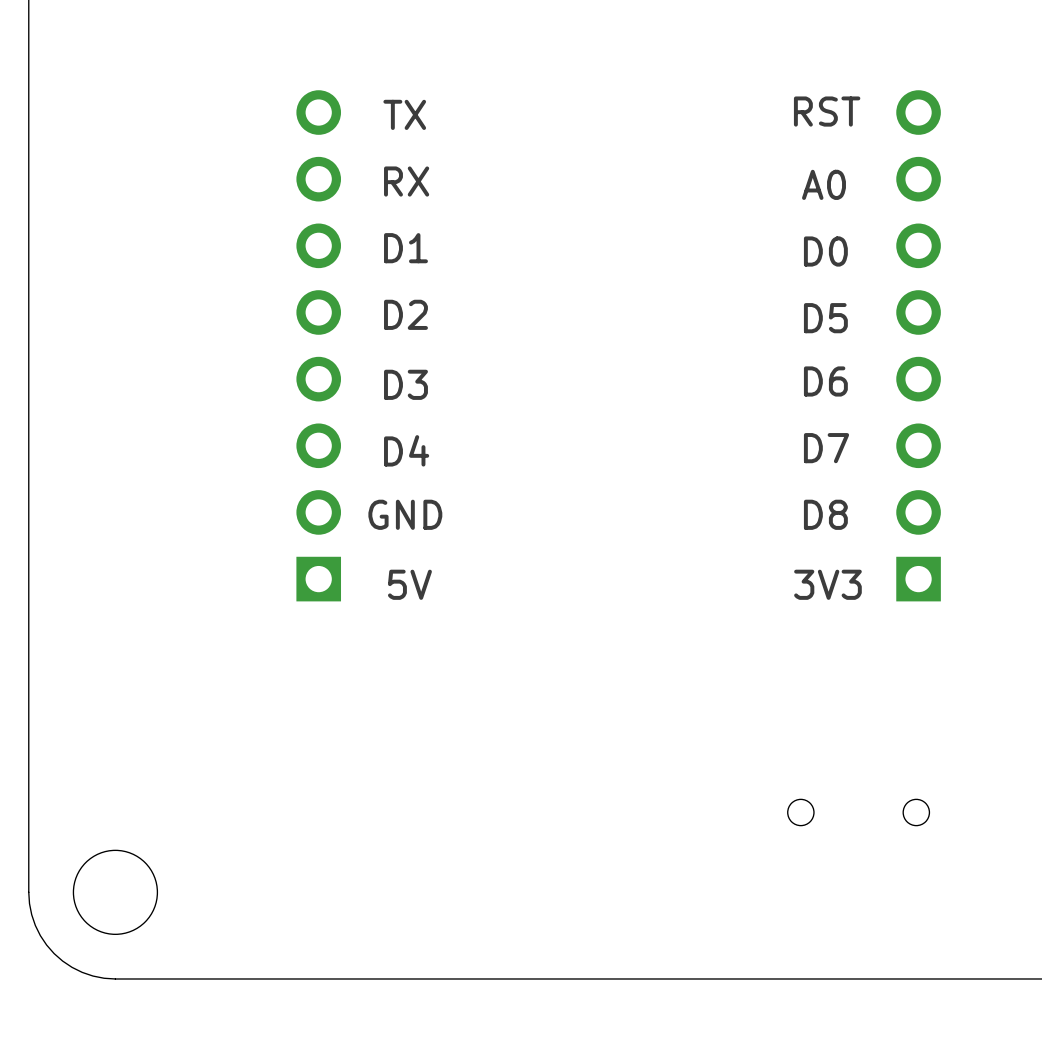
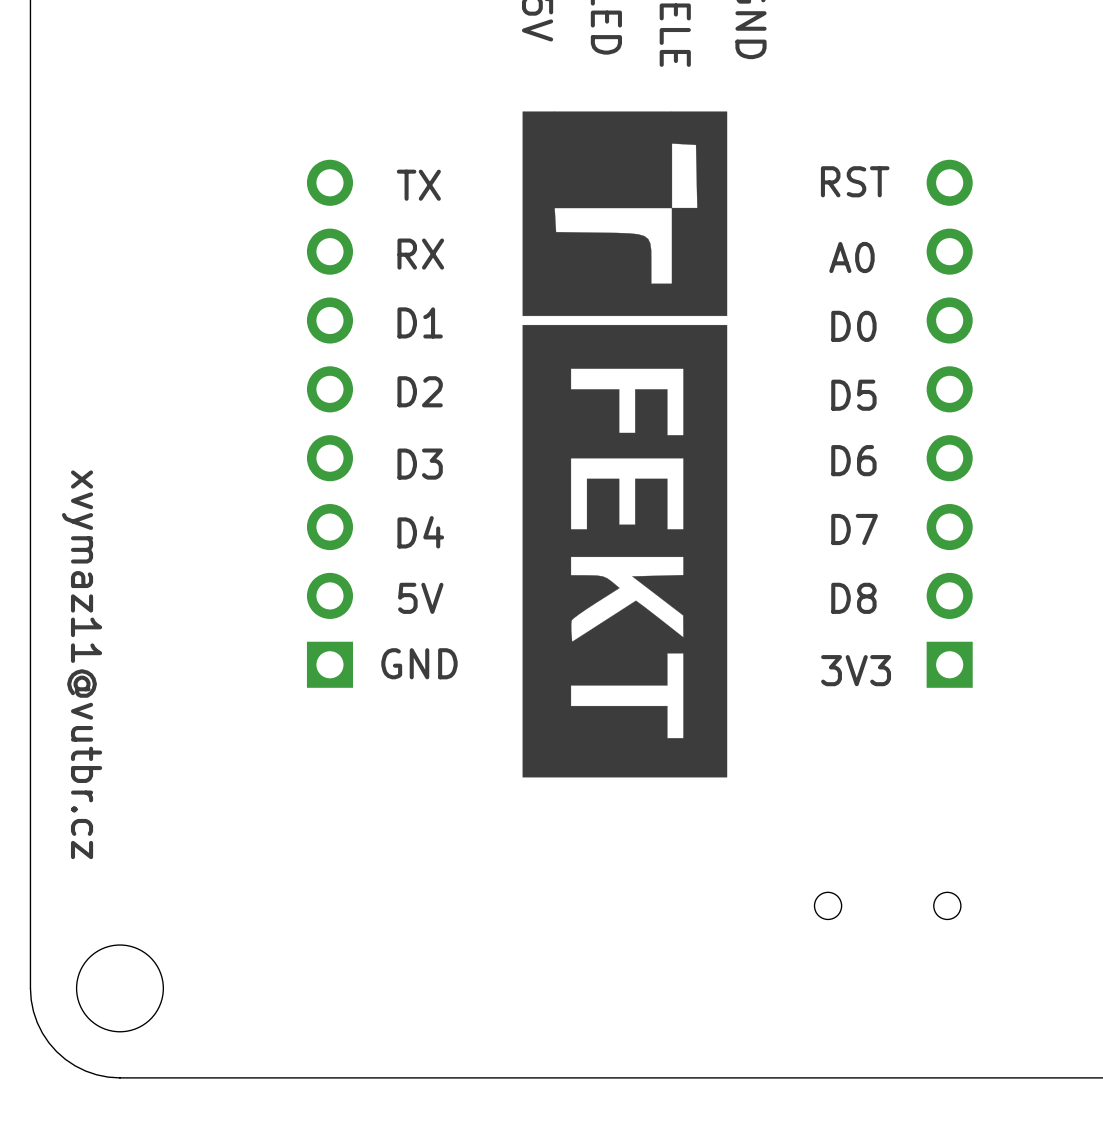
drawing: none -> [522, 111, 728, 778]
text: GND (405, 514) -> 5V (420, 598)
text: none -> xvymaz11@vutbr.cz (82, 664)
text: 5V (409, 584) -> GND (419, 663)

